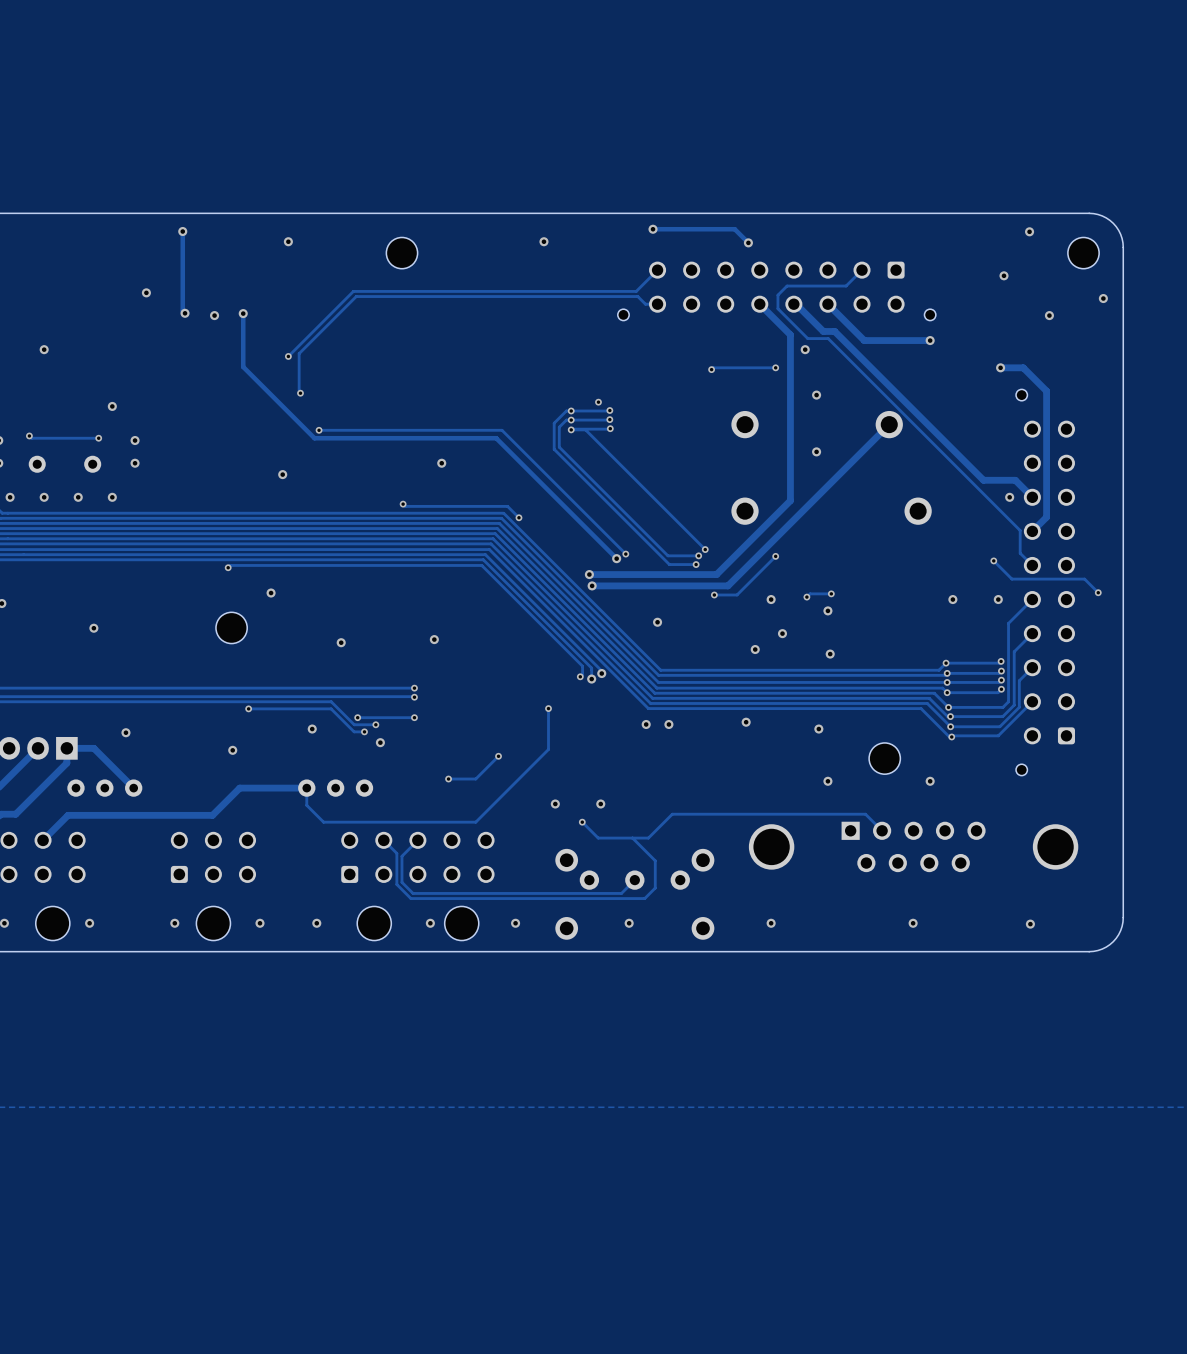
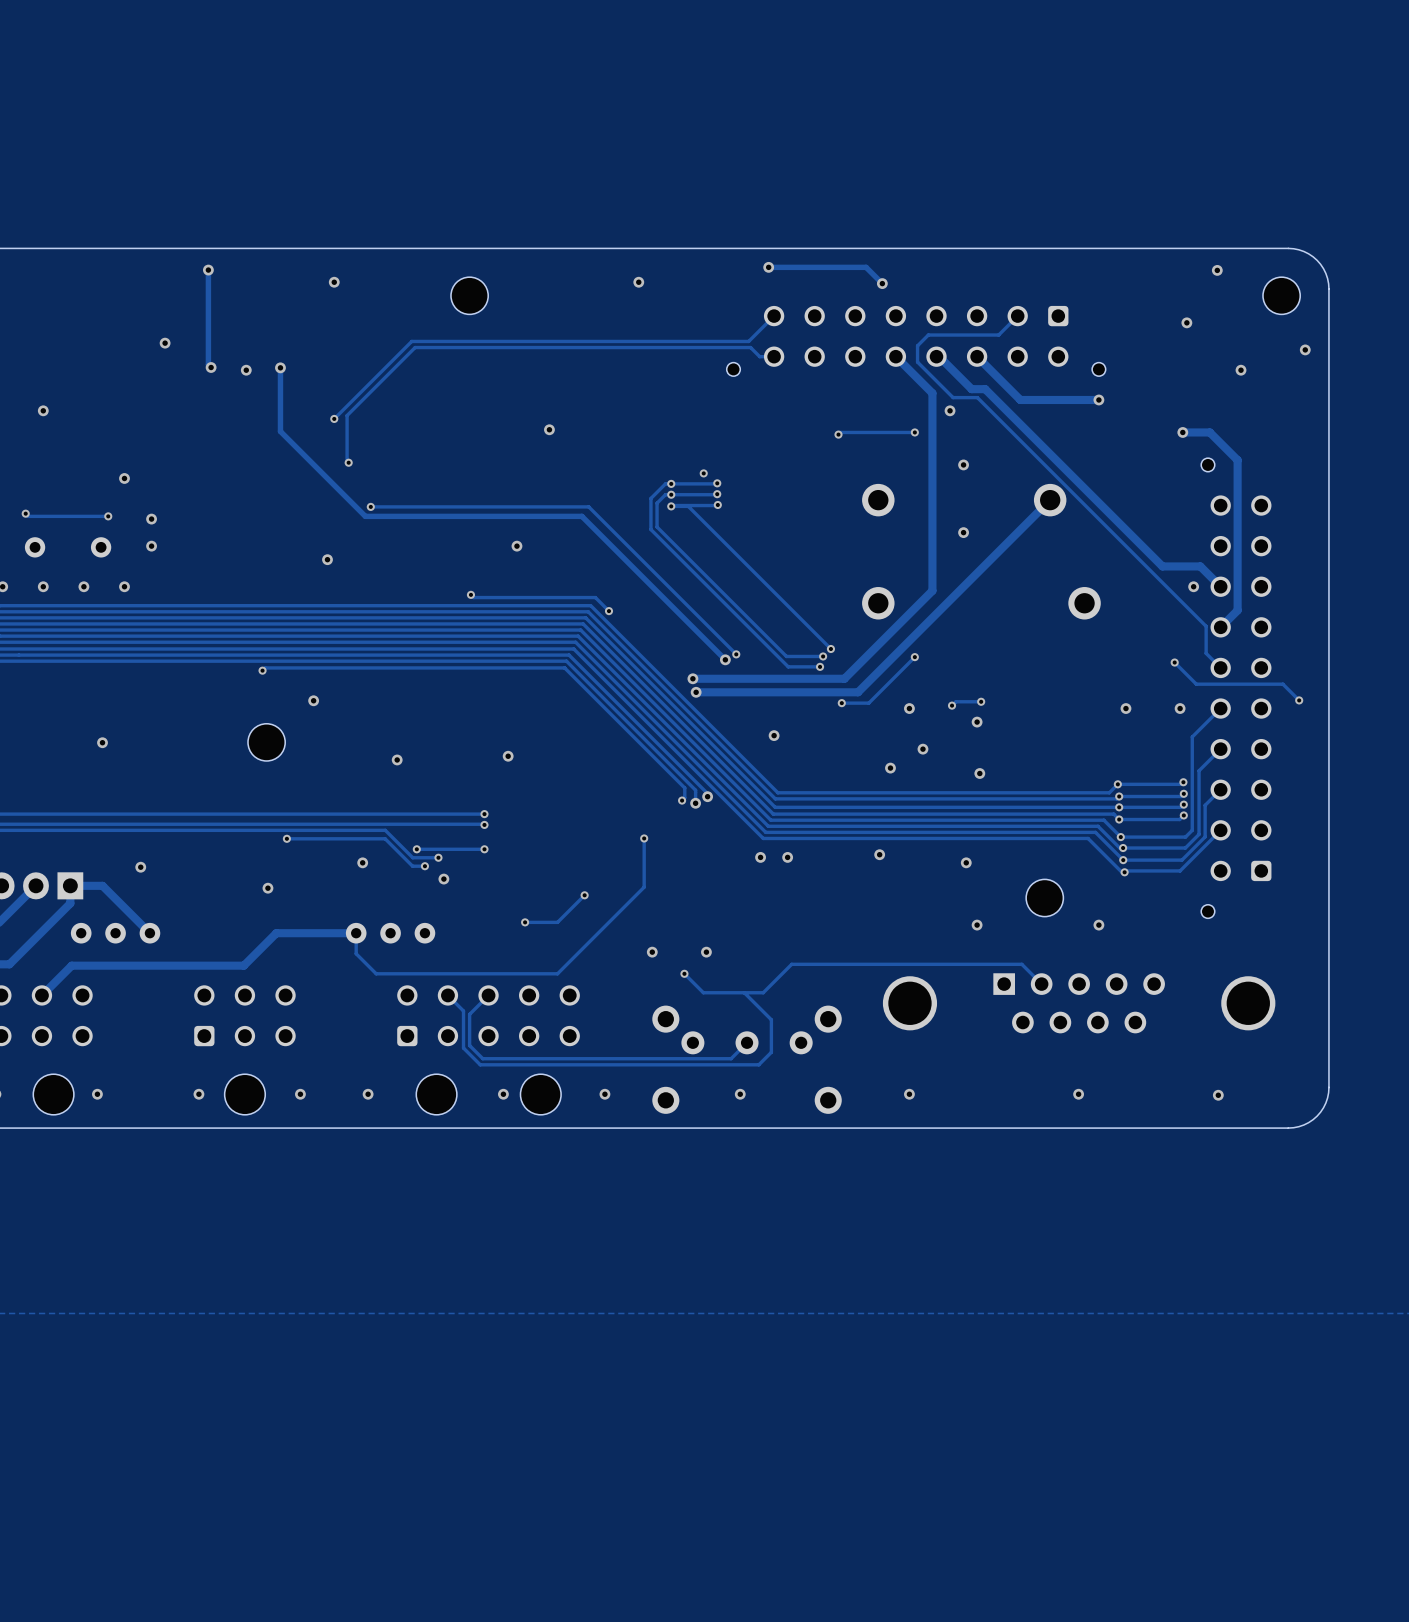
via: none -> (549, 429)

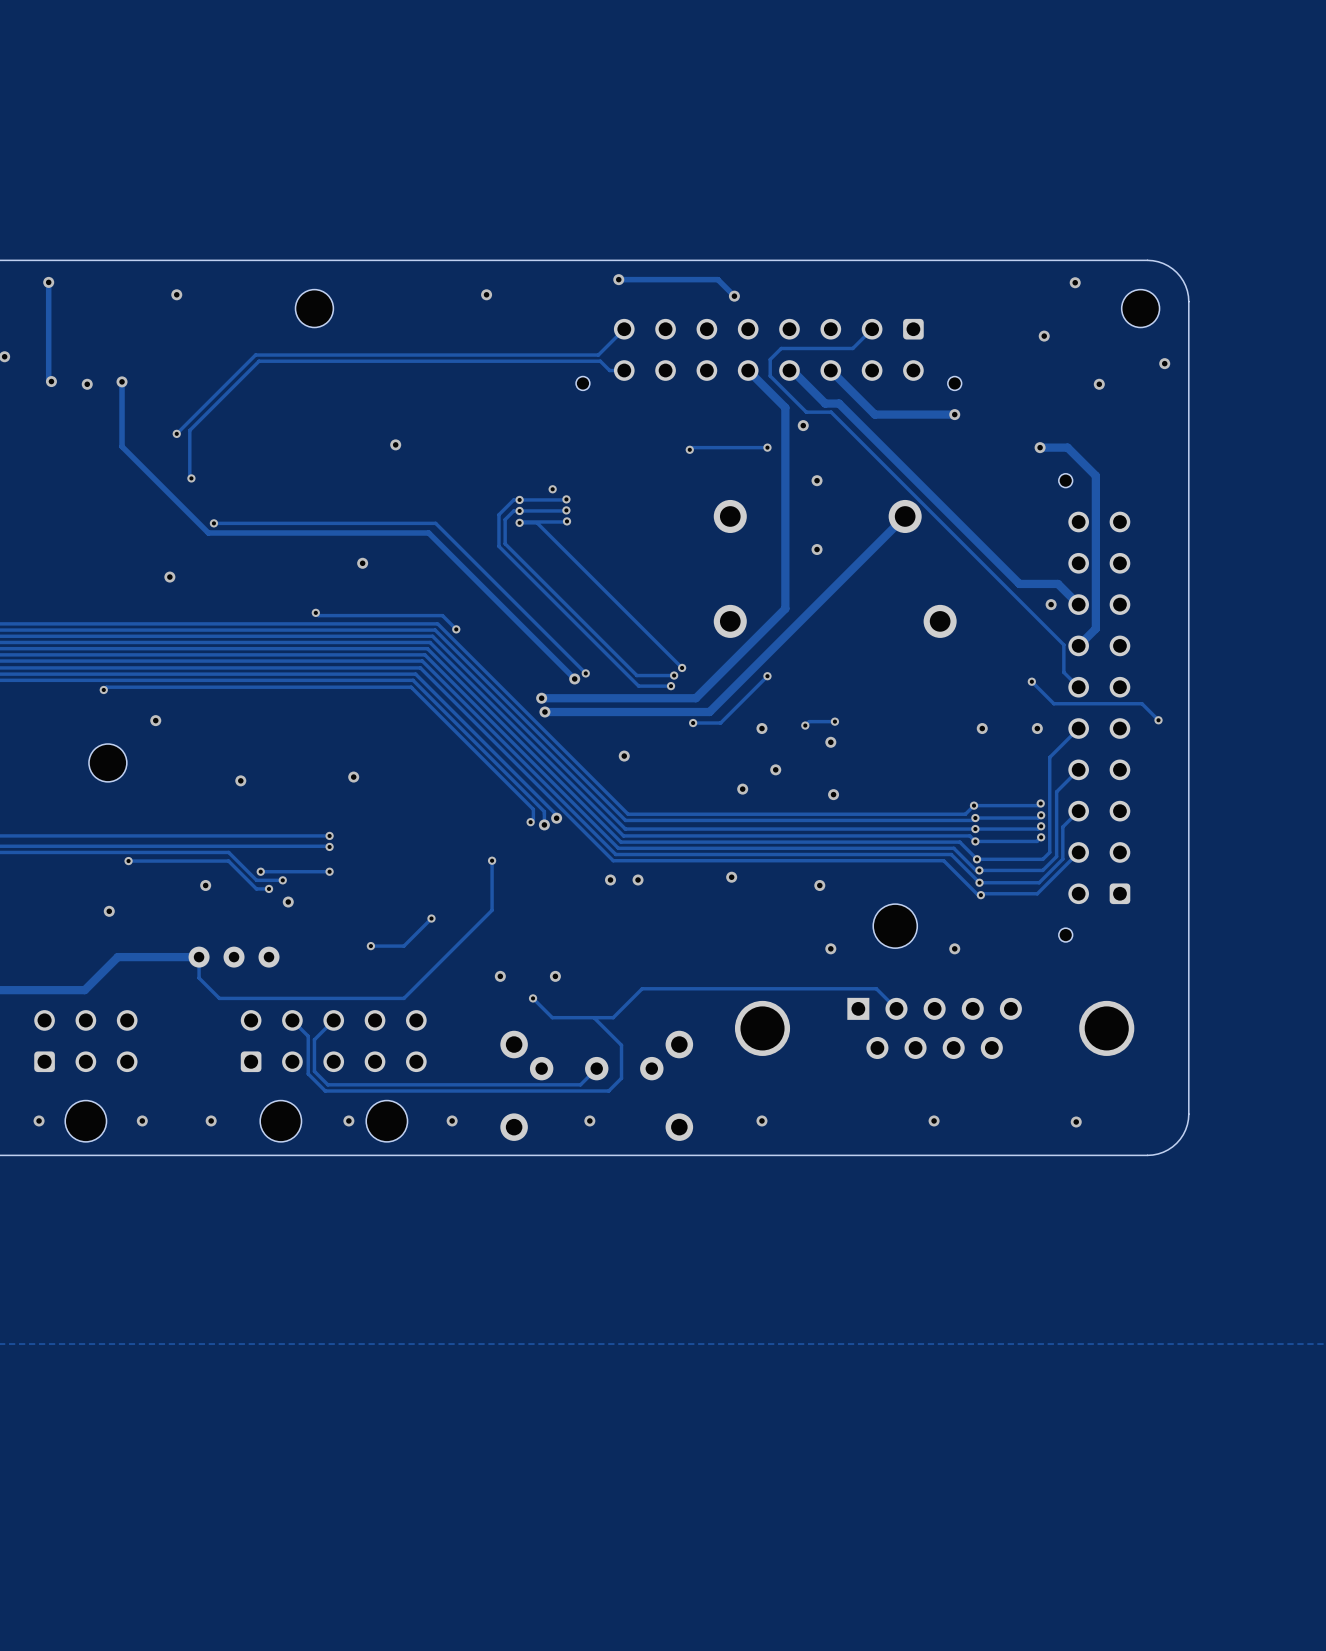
part footprint: [1026, 879, 1064, 917] -> [873, 904, 918, 949]

